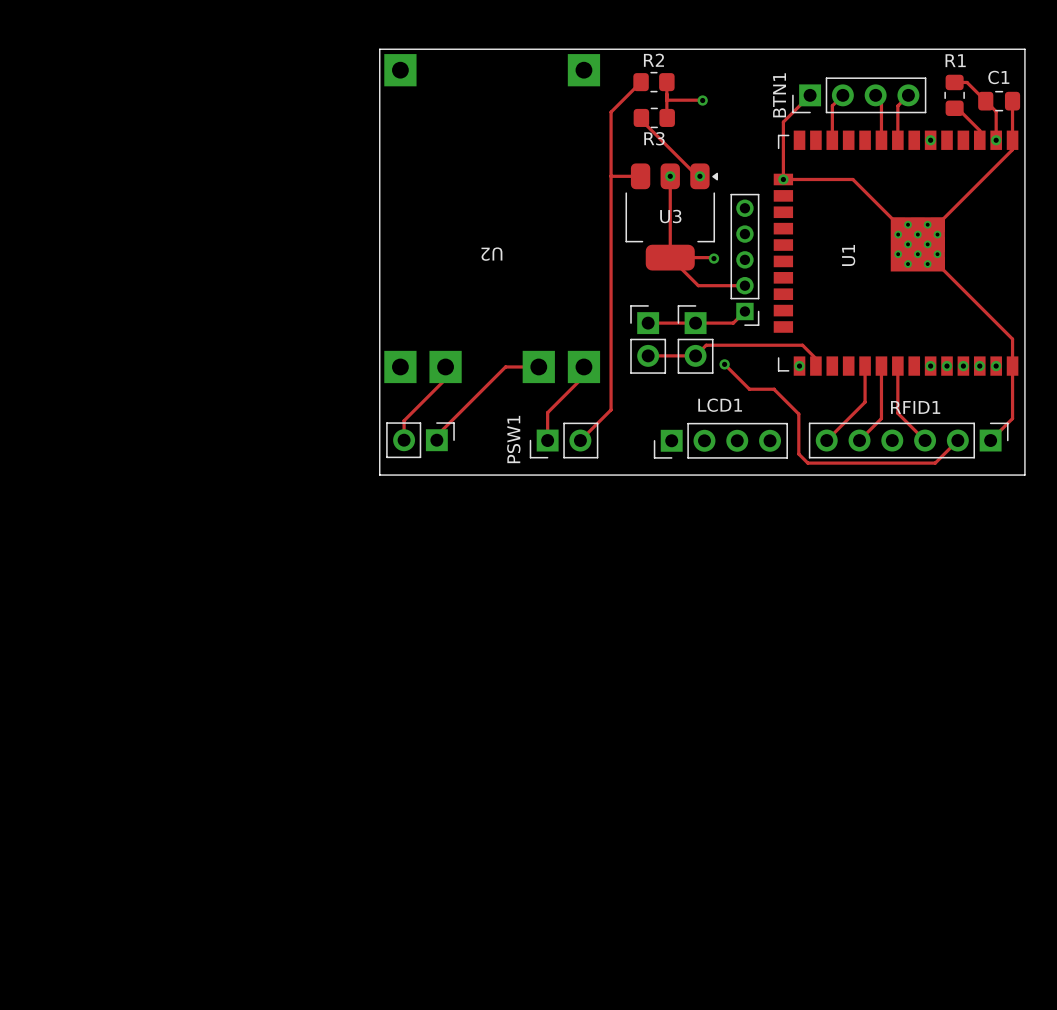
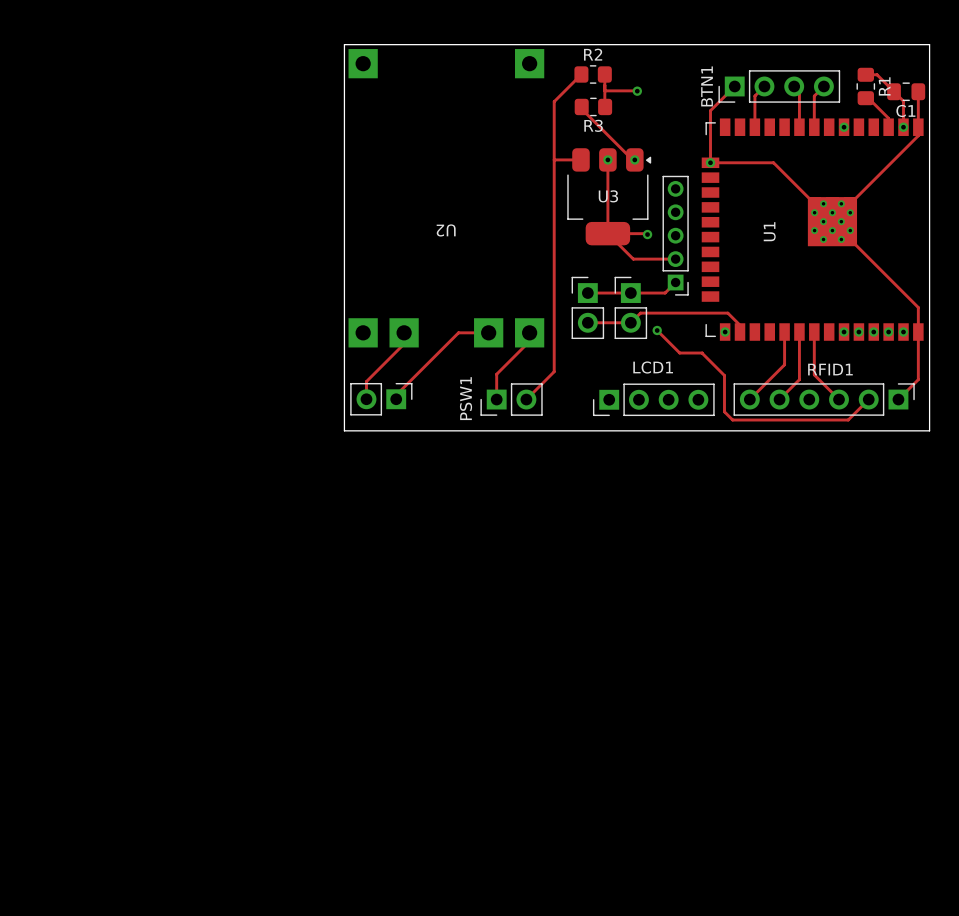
R1 name rotation: 0° (955, 60) -> 90° counterclockwise (884, 86)
R1 name position: R1 (955, 60) -> R1 (884, 86)
C1 name position: C1 (998, 77) -> C1 (905, 110)

